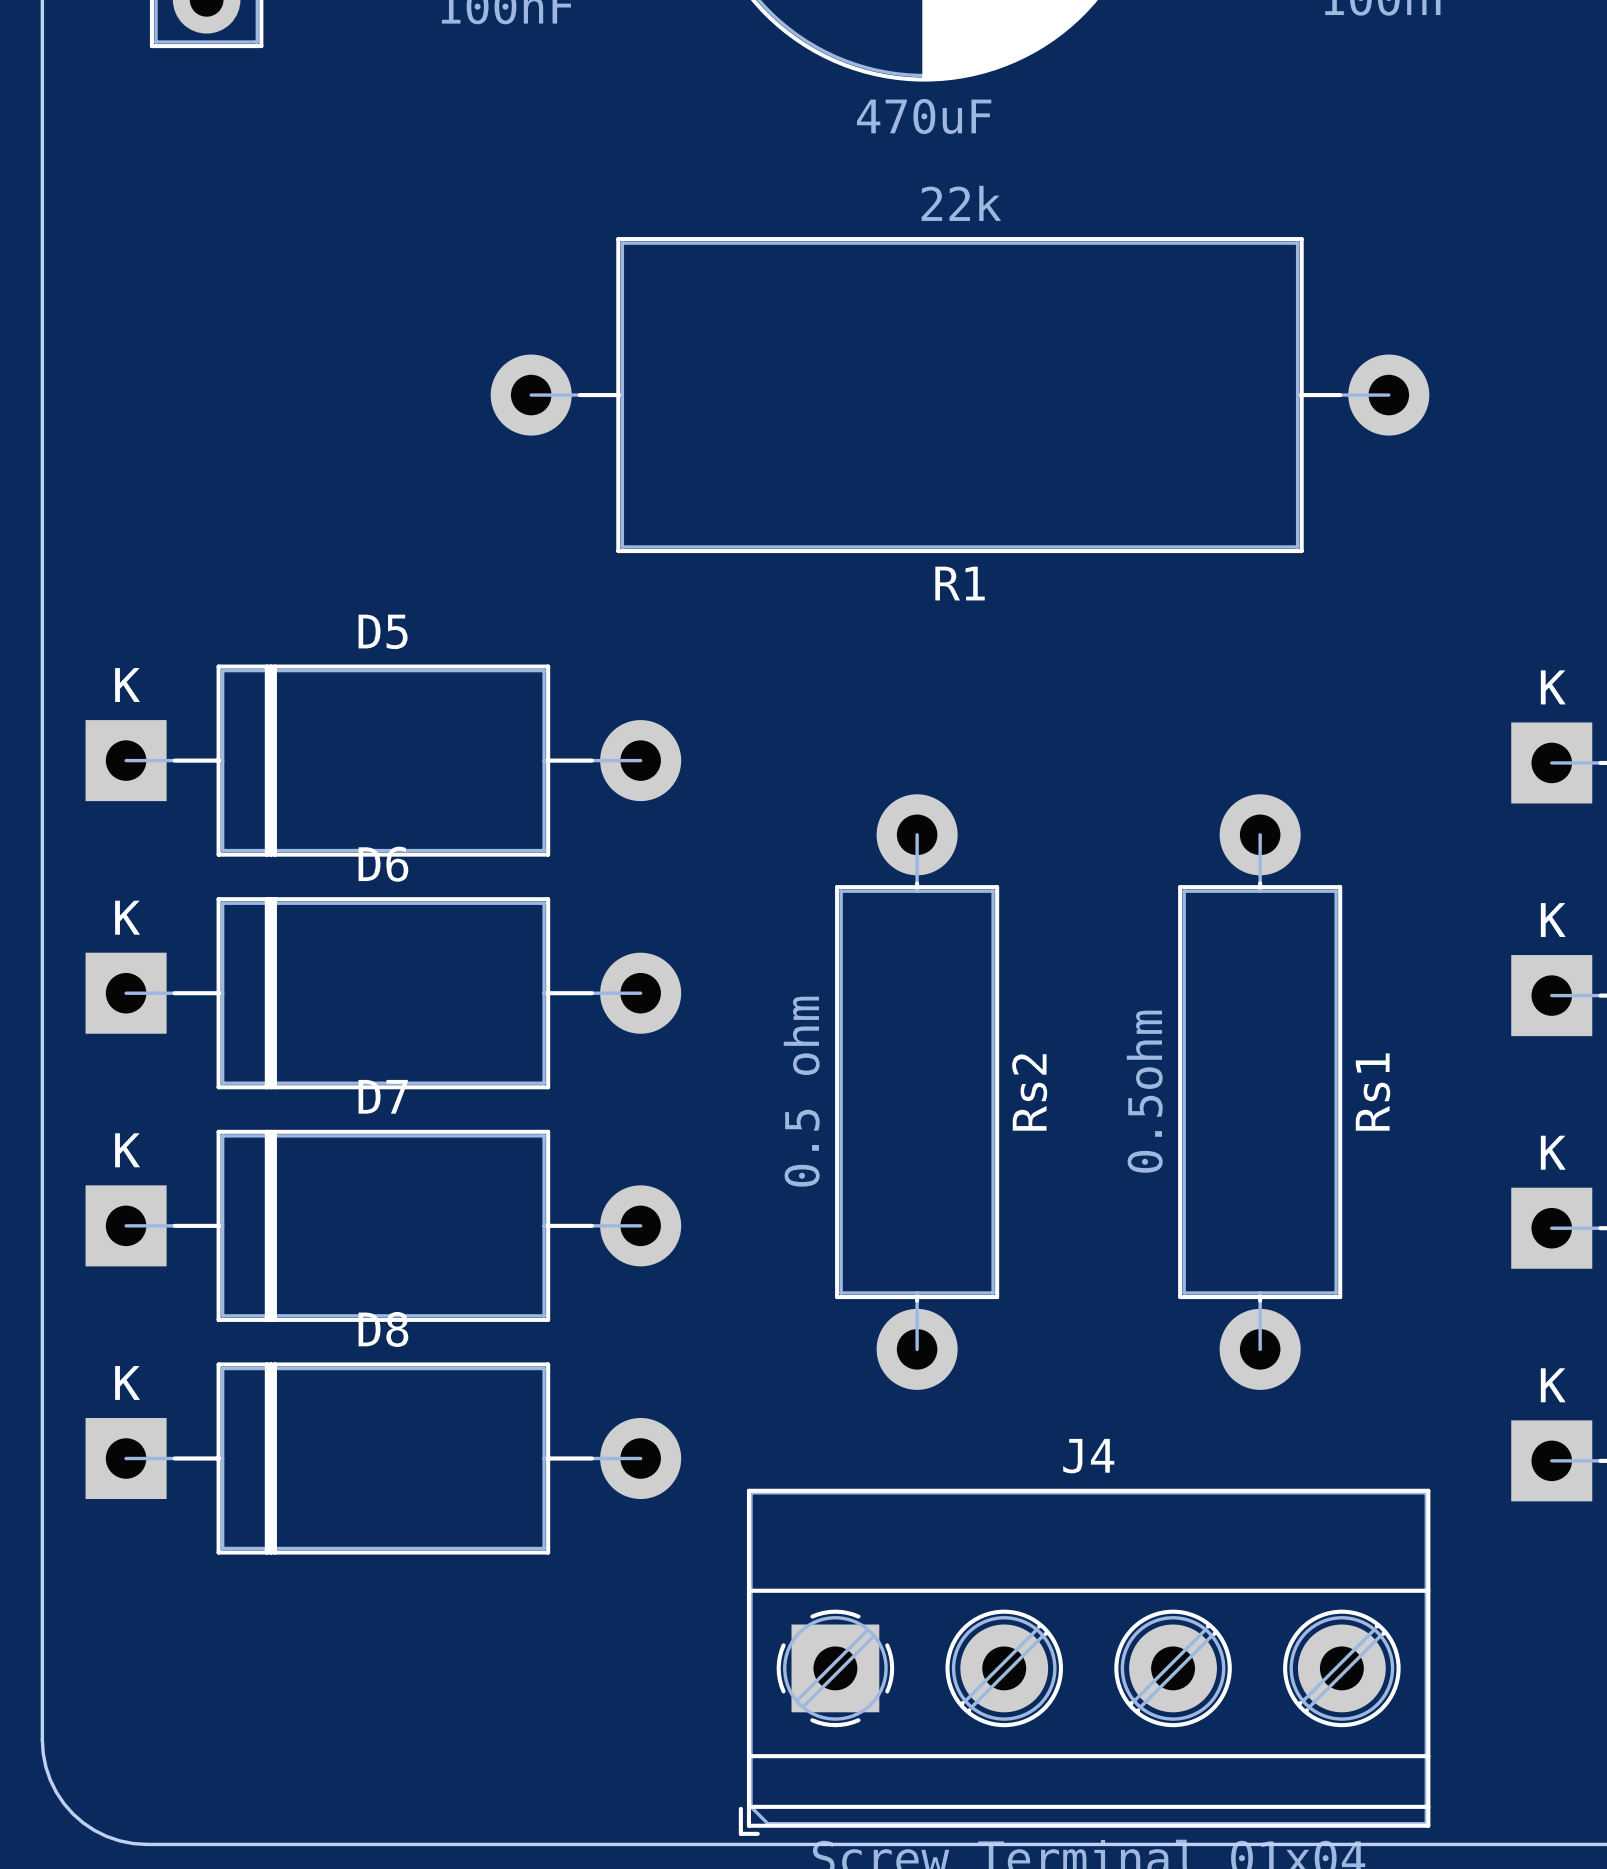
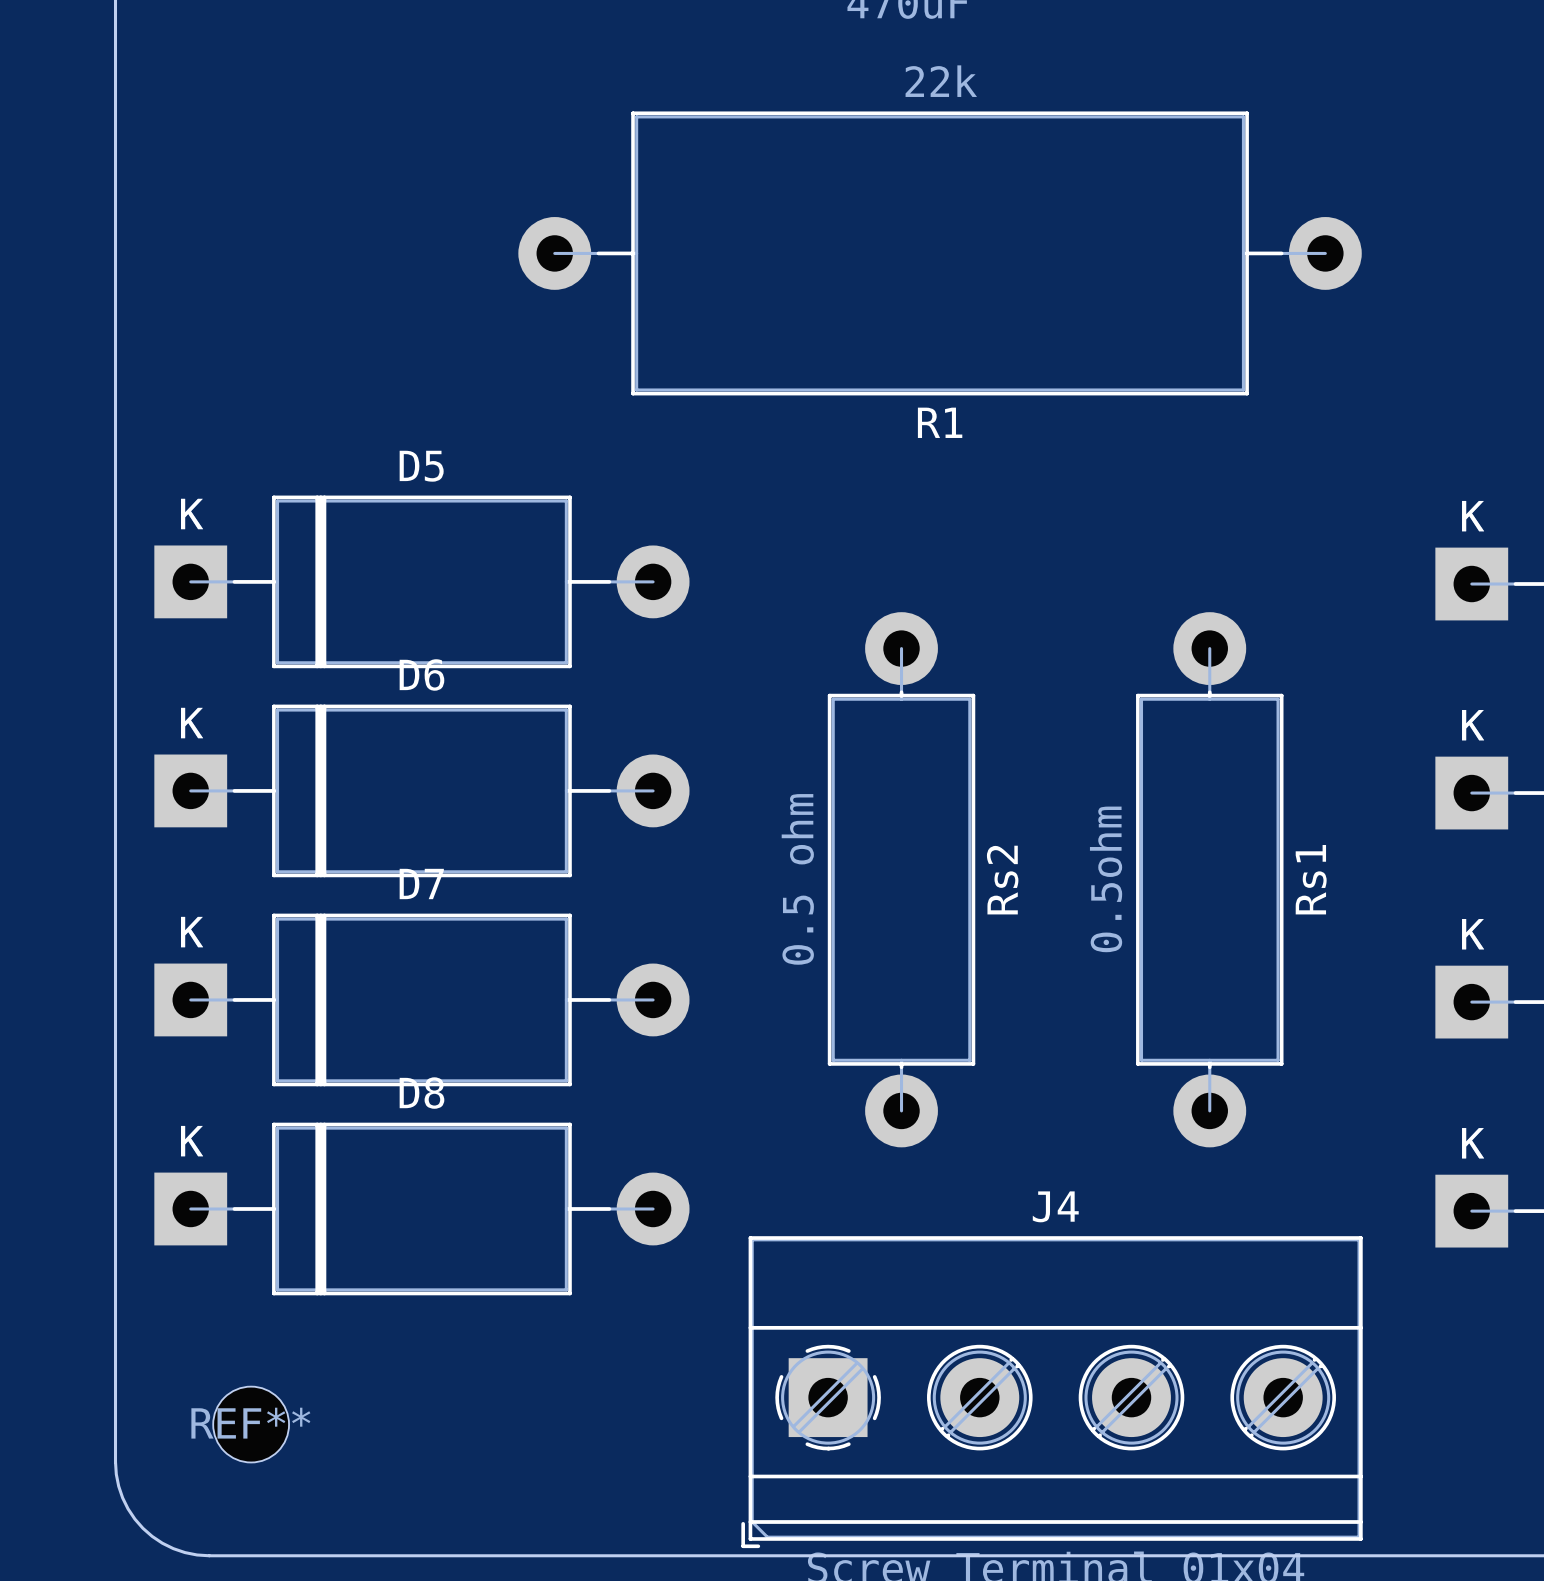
REF**: none -> (251, 1424)

